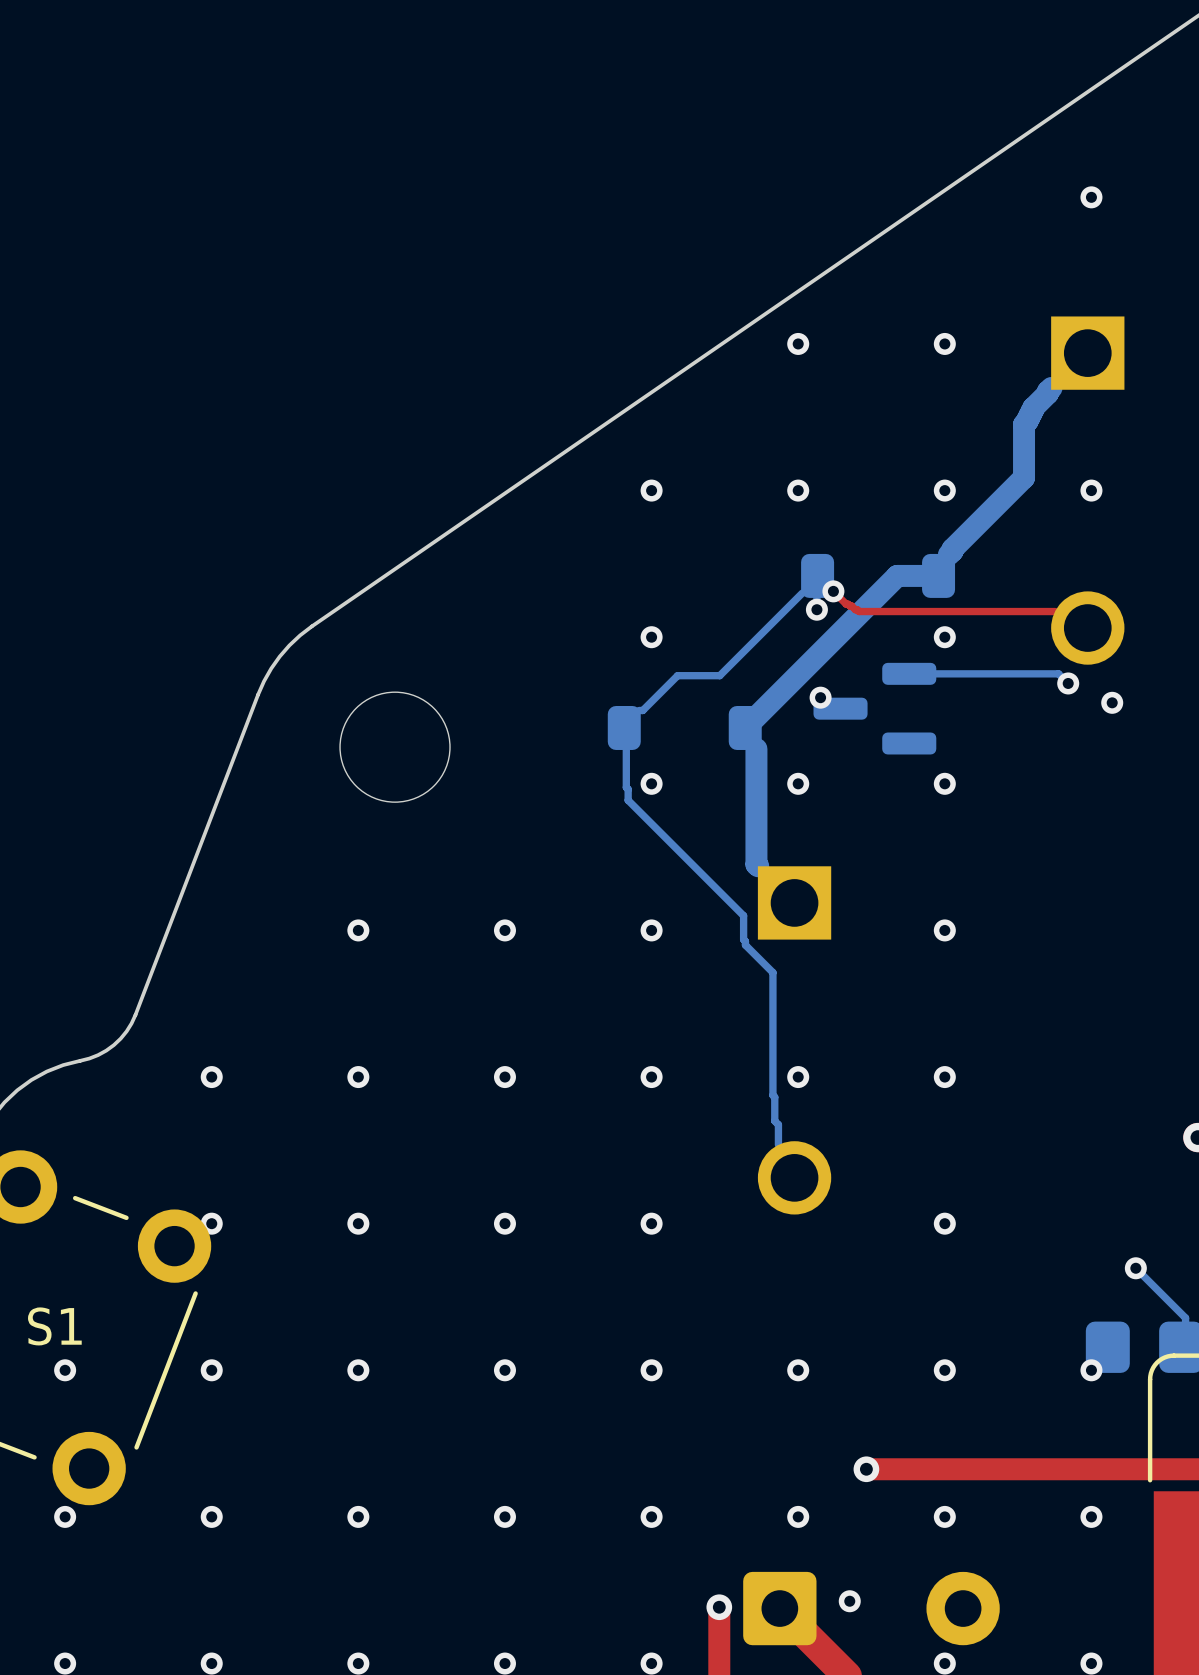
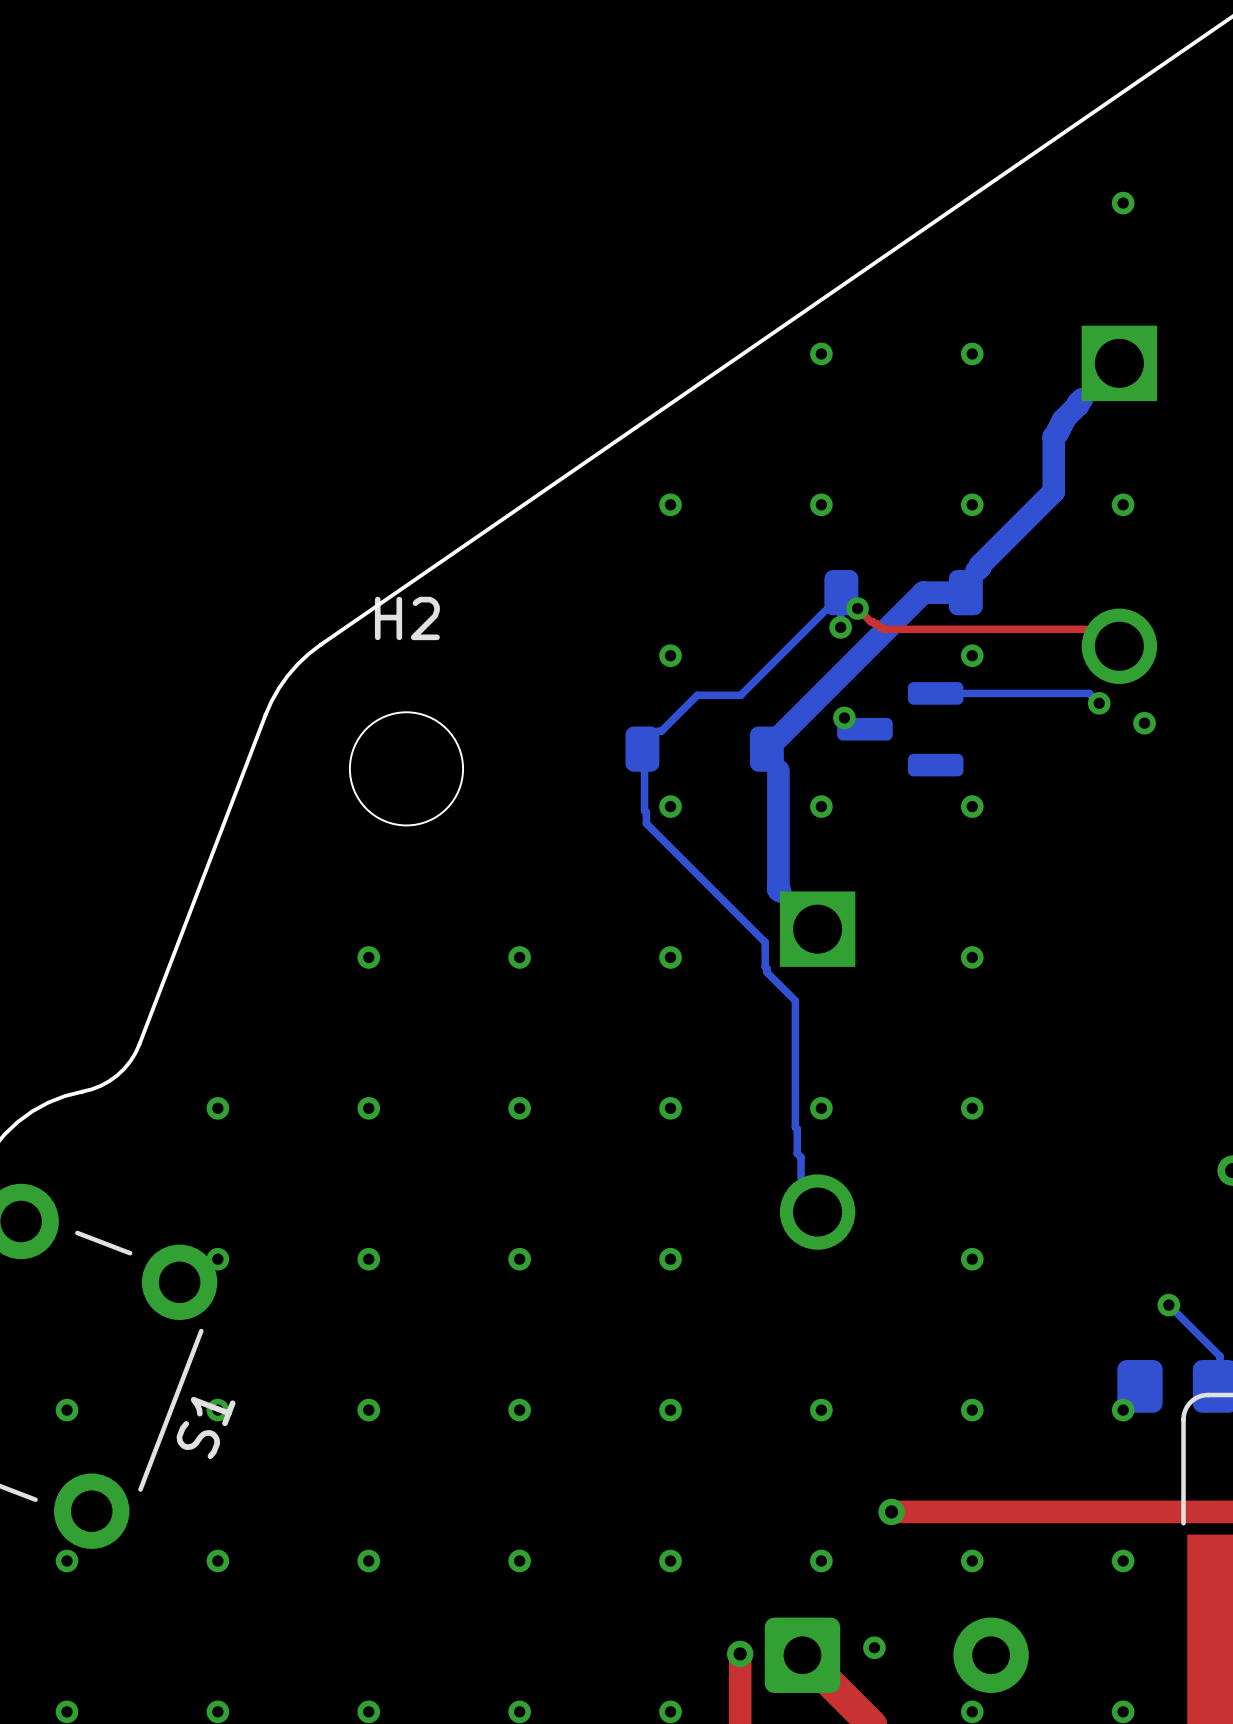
H2 name: none -> H2 (407, 618)
S1 name rotation: 0° (54, 1326) -> 69° counterclockwise (206, 1427)
S1 name position: S1 (54, 1326) -> S1 (206, 1427)

